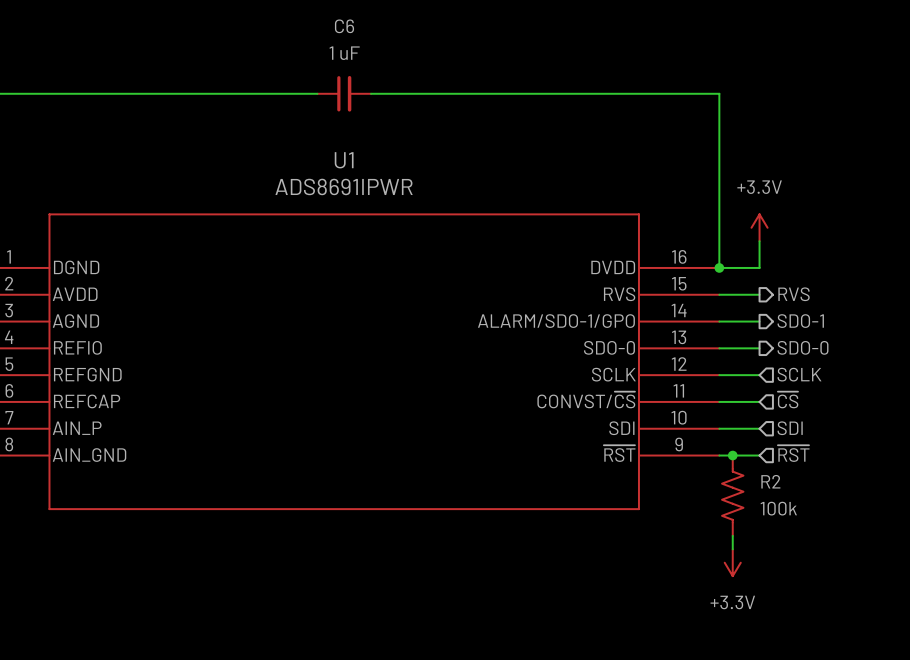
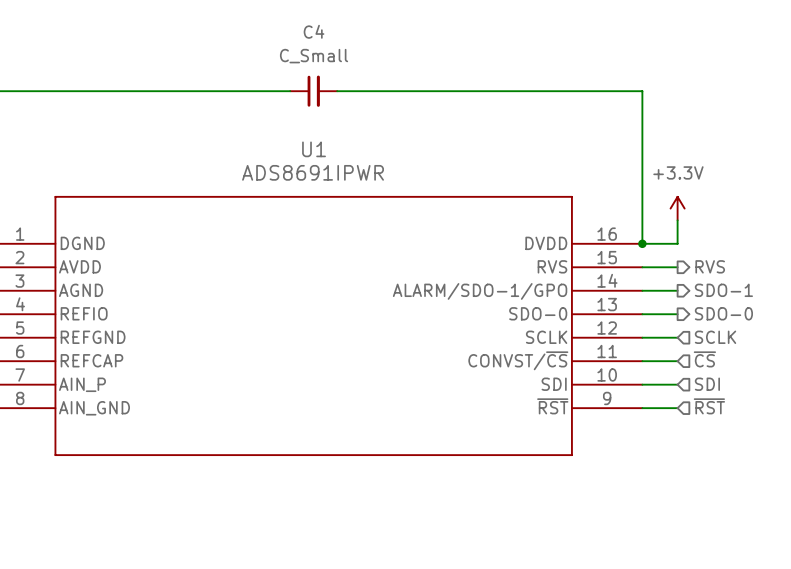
C6 name: C6 (344, 26) -> C4 (314, 31)
C6 value: 1 uF (344, 53) -> C_Small (314, 56)
junction: (732, 455) -> none
R2: 100k (732, 495) -> none
wire: (732, 535) (732, 549) -> none
power symbol: +3.3V (732, 562) -> none

